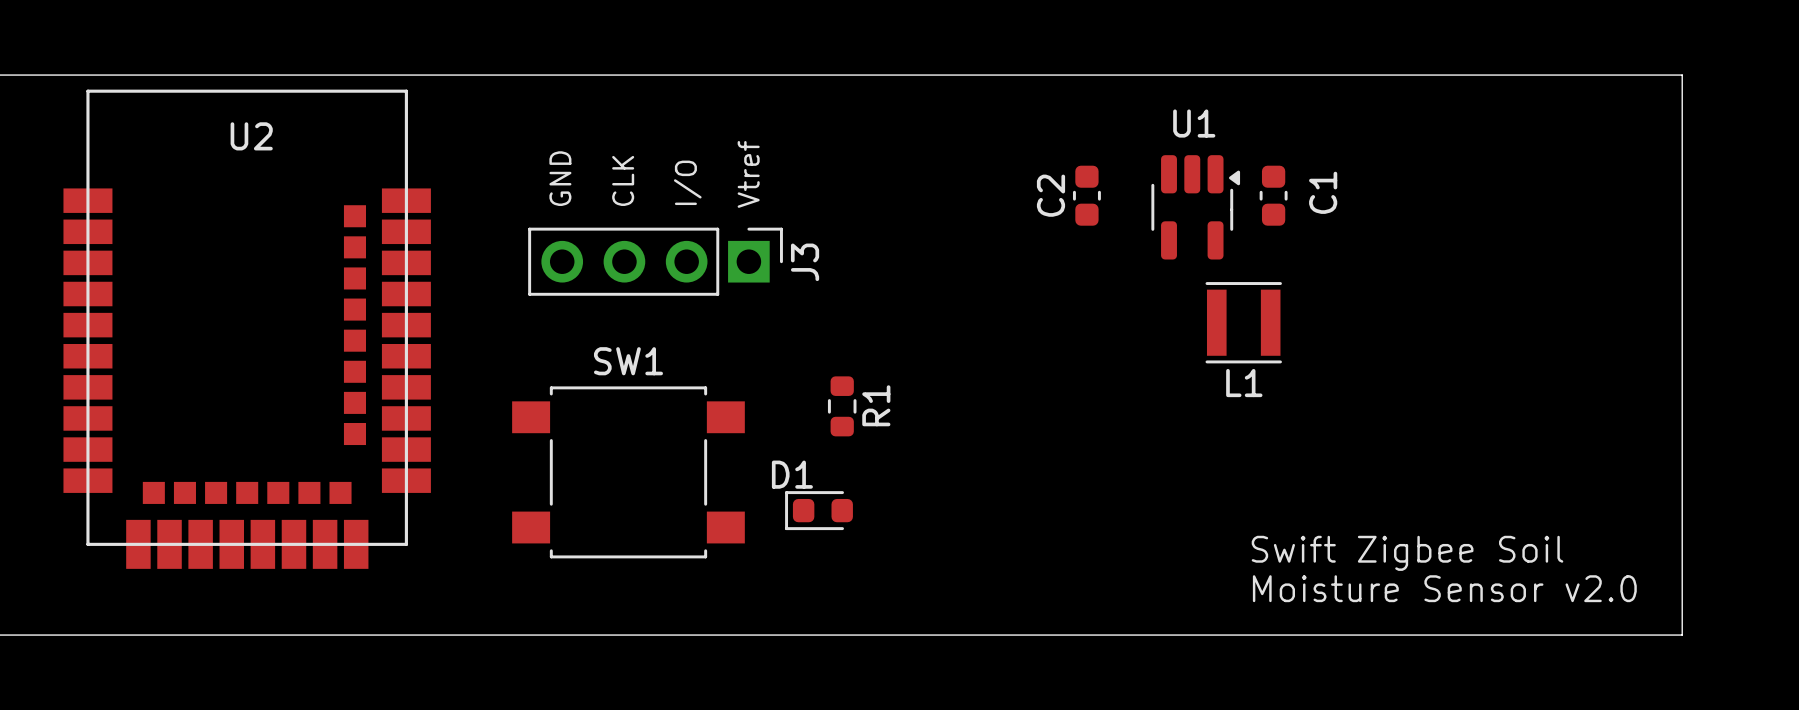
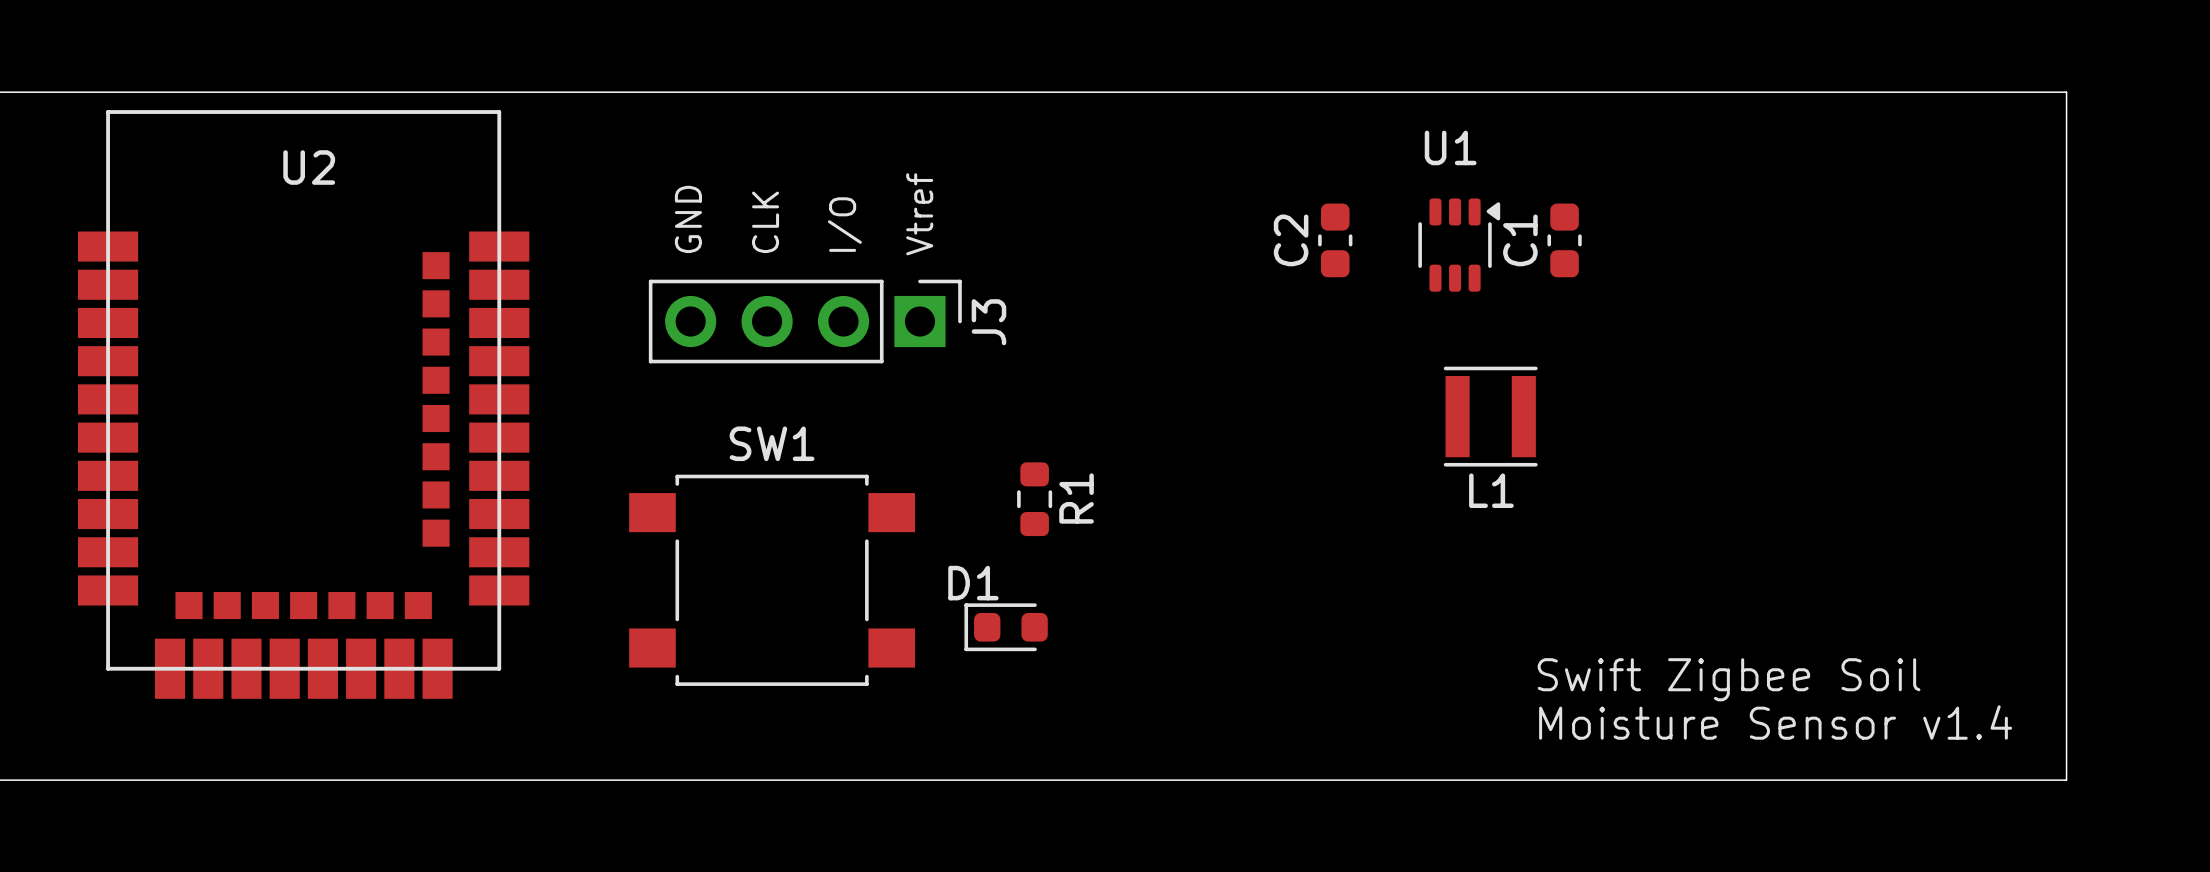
U1 footprint: [1151, 155, 1241, 260] -> [1418, 198, 1501, 292]
C1 name position: C1 (1323, 192) -> C1 (1520, 240)
L1 position: (1243, 322) -> (1490, 416)
text: Moisture Sensor v2.0 (1444, 588) -> Moisture Sensor v1.4 (1775, 722)

